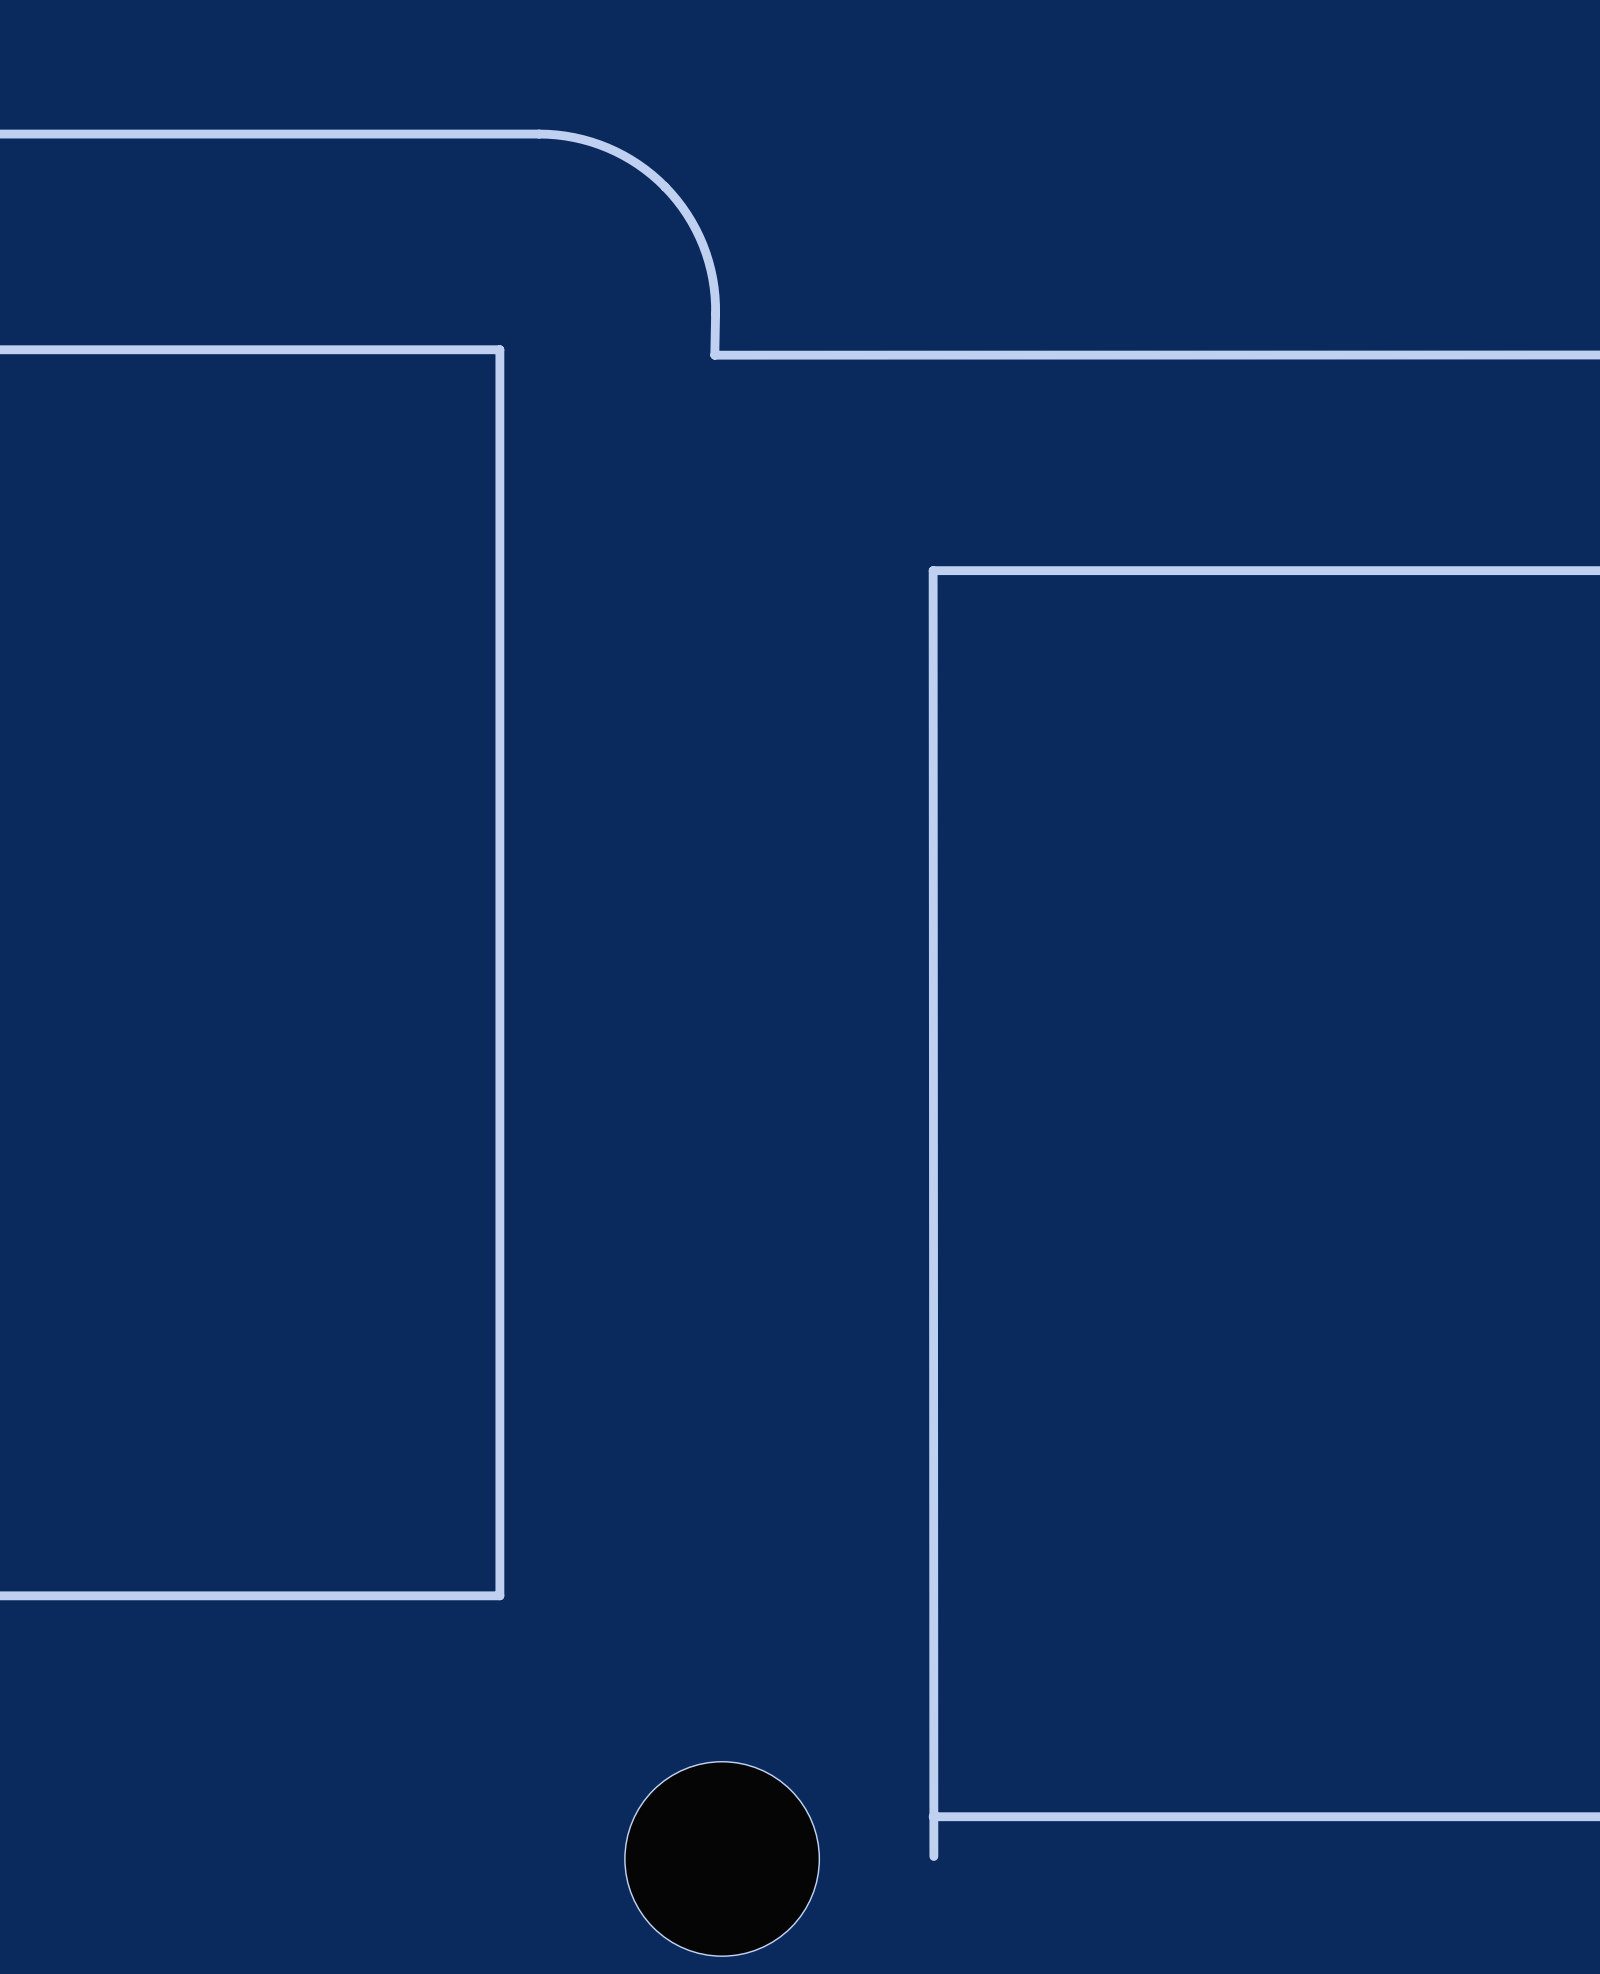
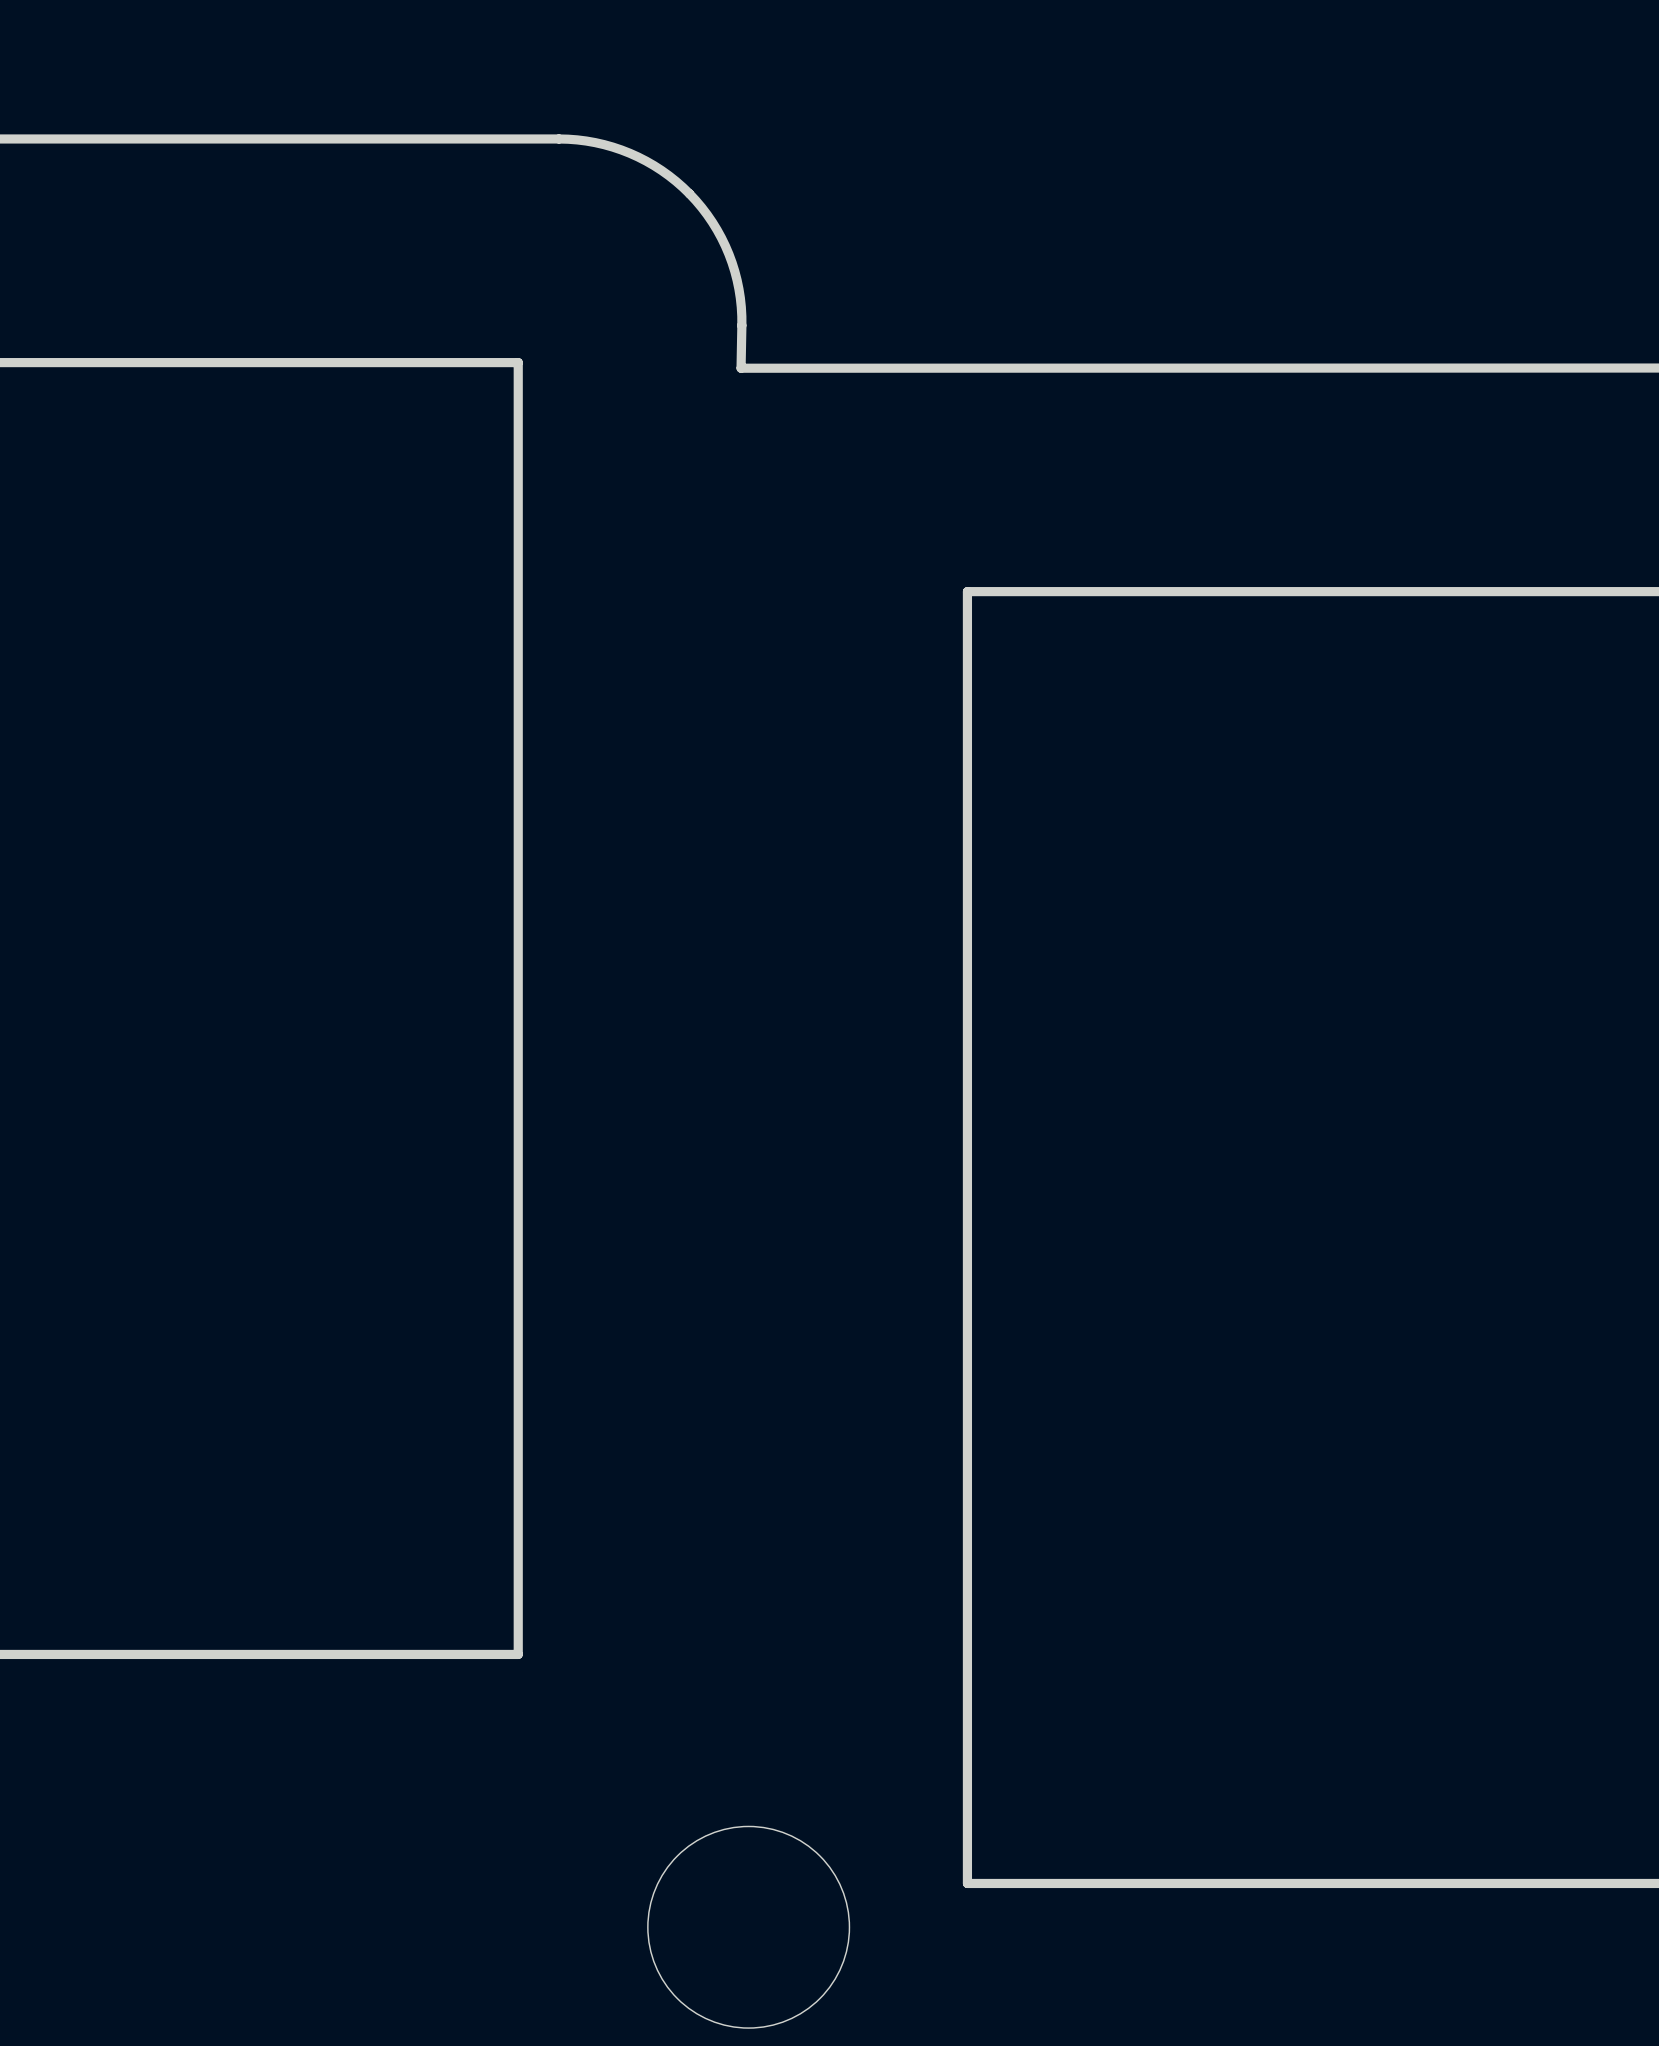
board edge: (933, 570) (933, 1856) -> (967, 591) (967, 1883)

